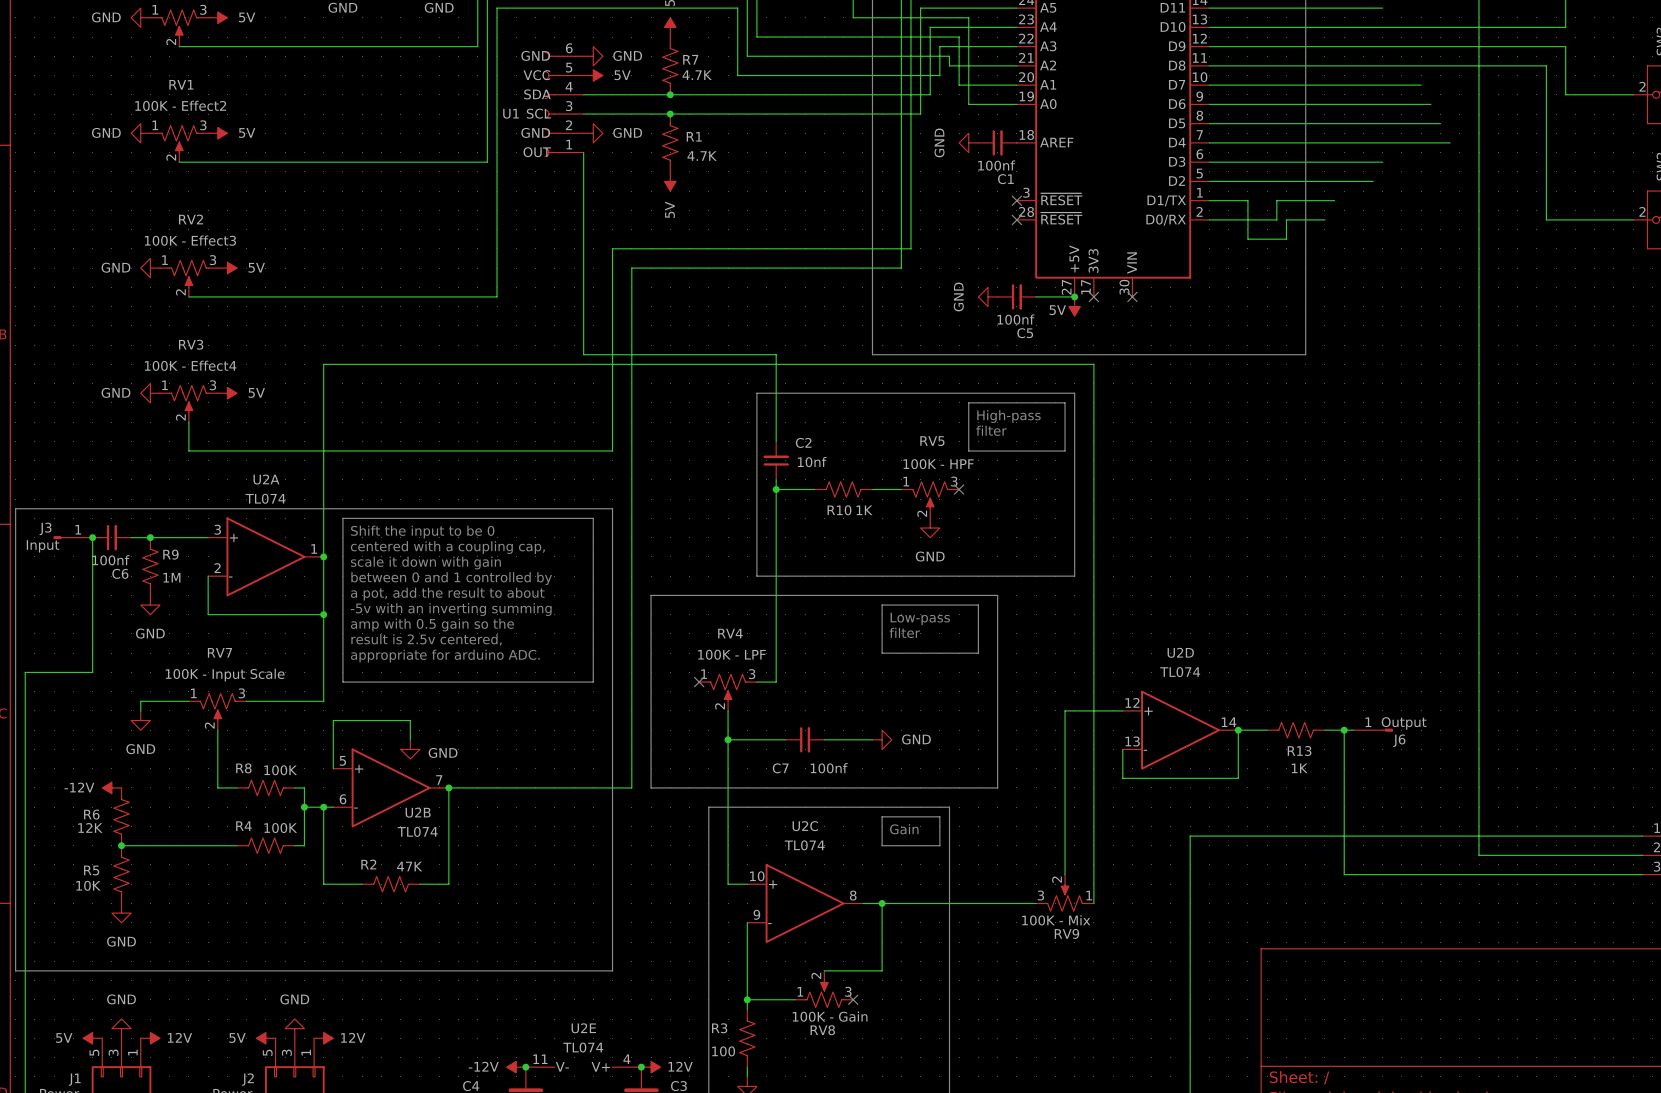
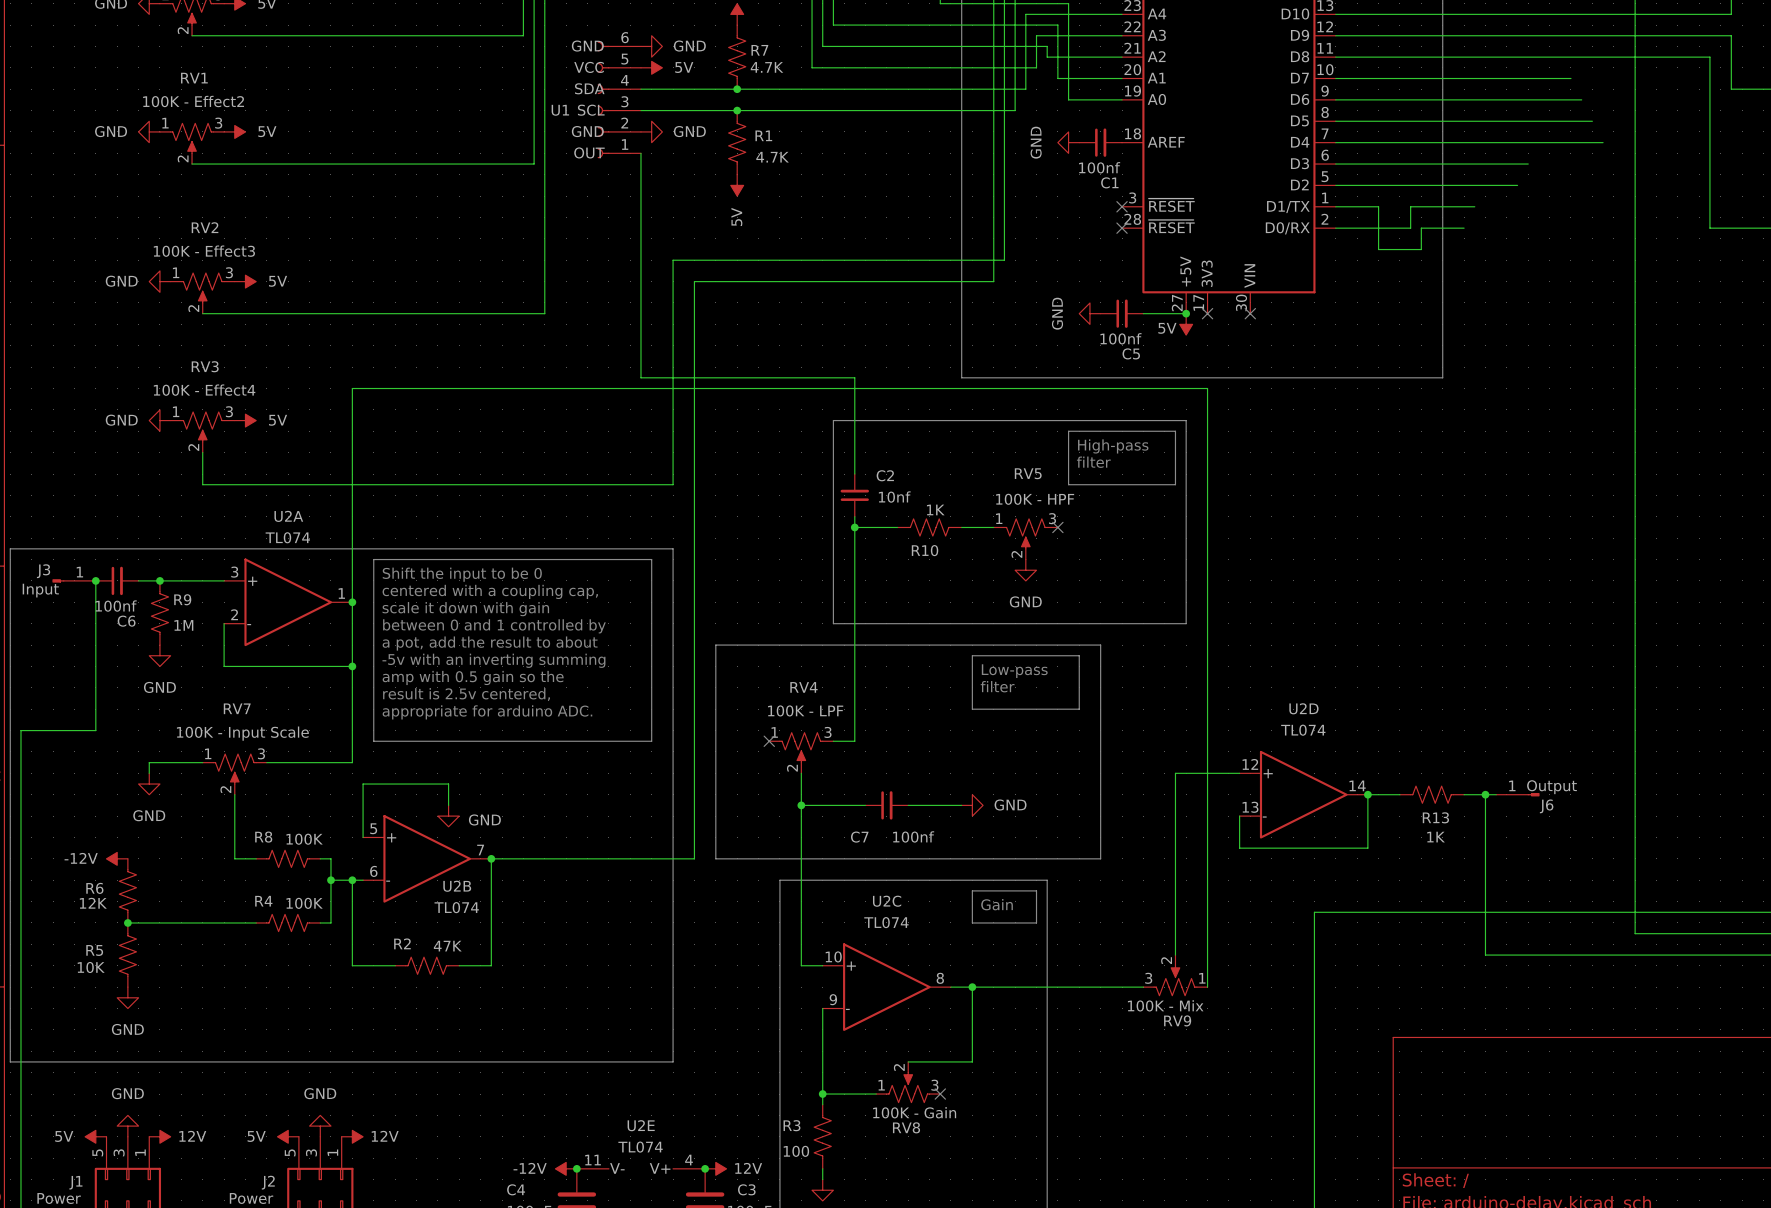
R10 value position: 1K (864, 510) -> 1K (935, 509)

